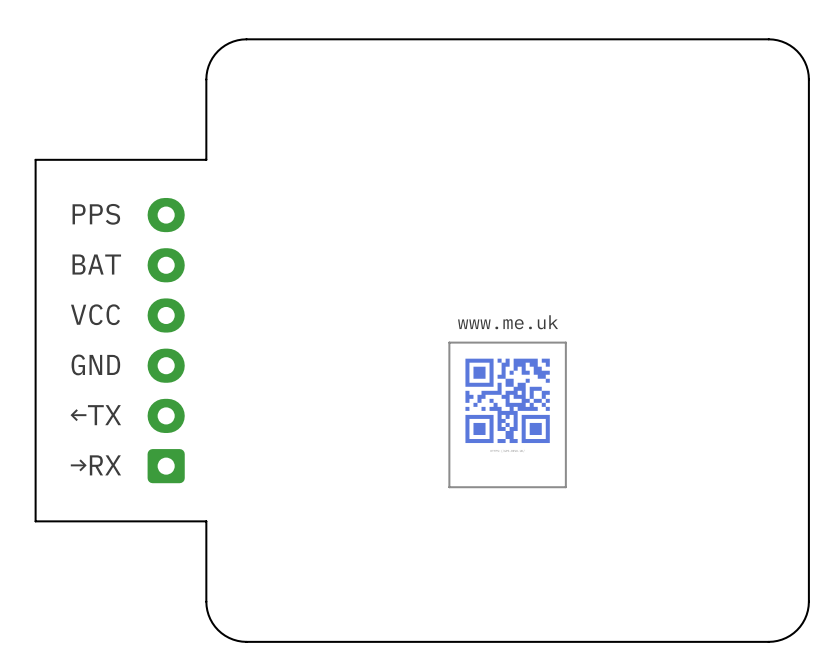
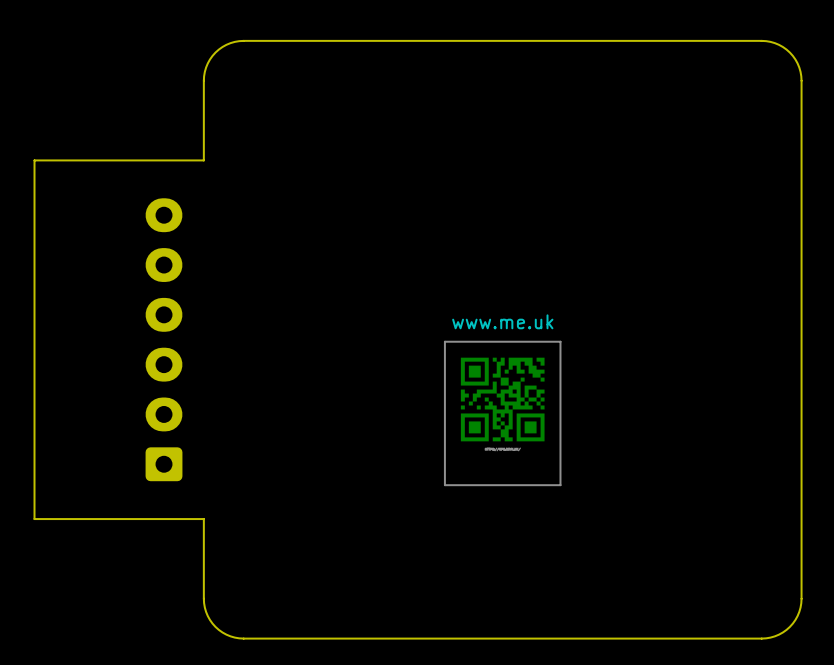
text: PPS (96, 214) -> none
text: BAT (96, 264) -> none
text: VCC (95, 314) -> none
text: GND (95, 364) -> none
text: ←TX (95, 415) -> none
text: →RX (95, 465) -> none

